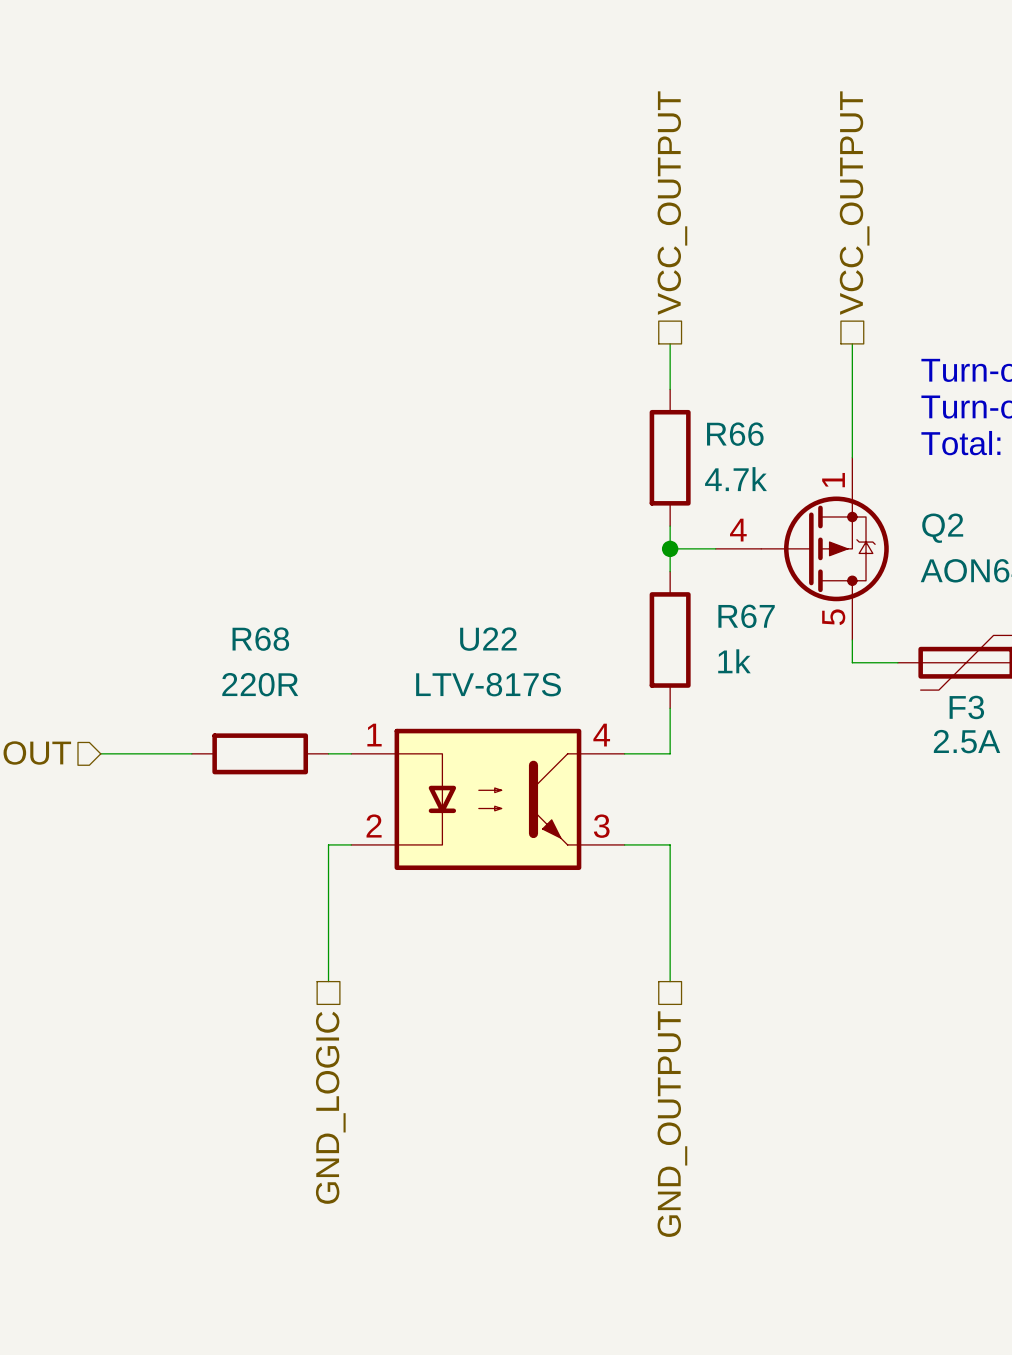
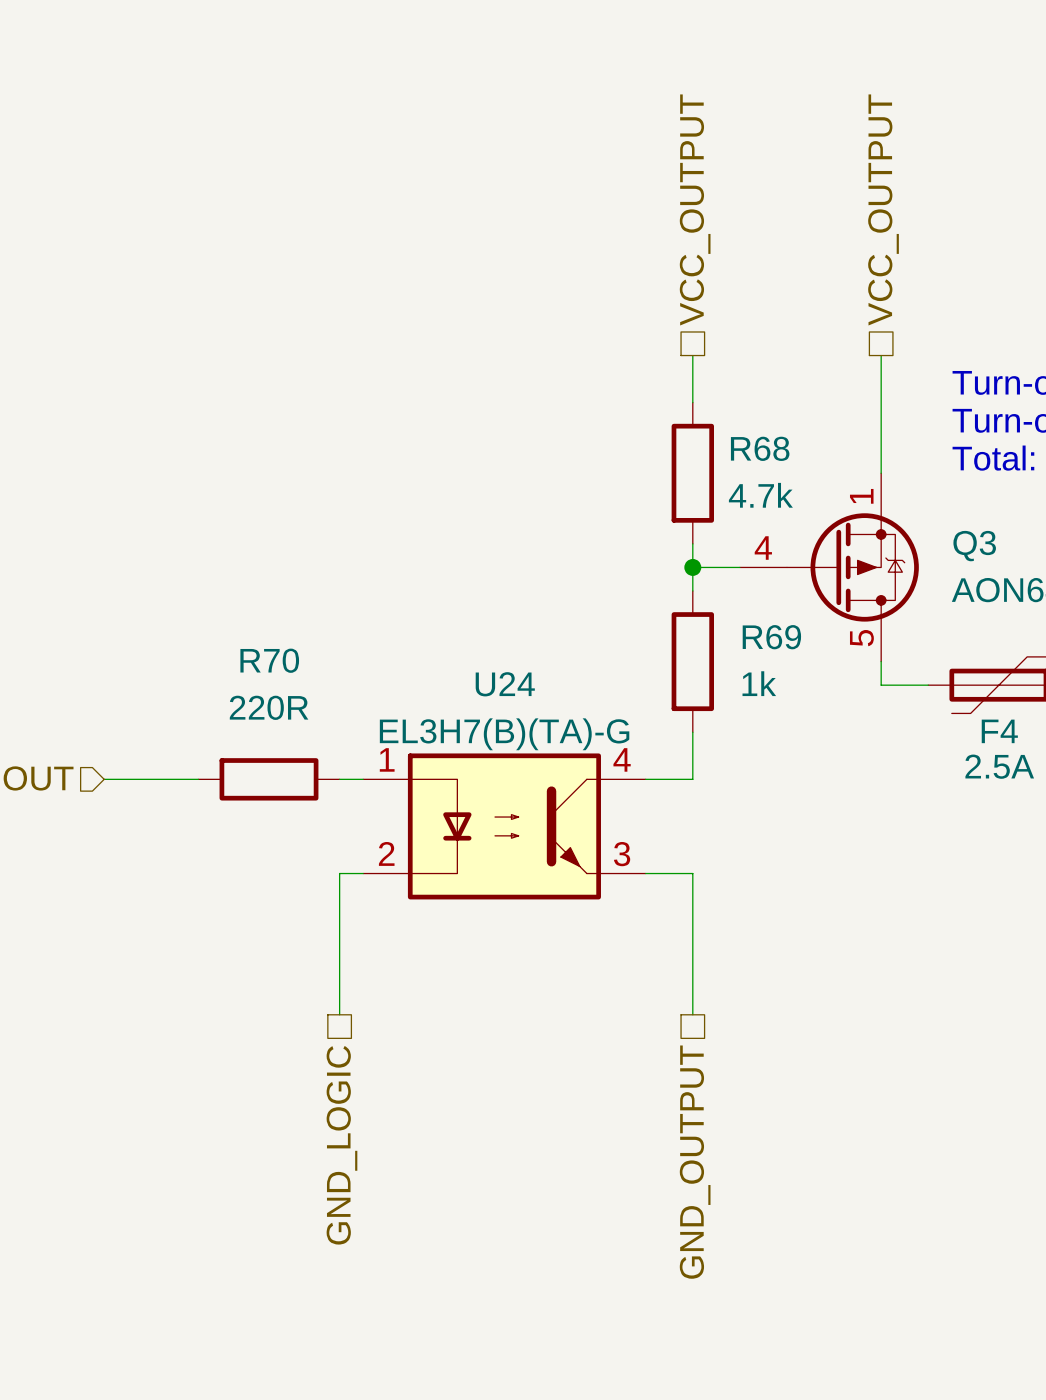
R66 name: R66 (735, 434) -> R68 (760, 448)
Q2 name: Q2 (942, 528) -> Q3 (974, 546)
R67 name: R67 (746, 616) -> R69 (771, 637)
R68 name: R68 (260, 639) -> R70 (269, 660)
F3 name: F3 (966, 707) -> F4 (999, 731)
U22: LTV-817S (487, 799) -> none
U24: none -> EL3H7(B)(TA)-G (504, 826)

